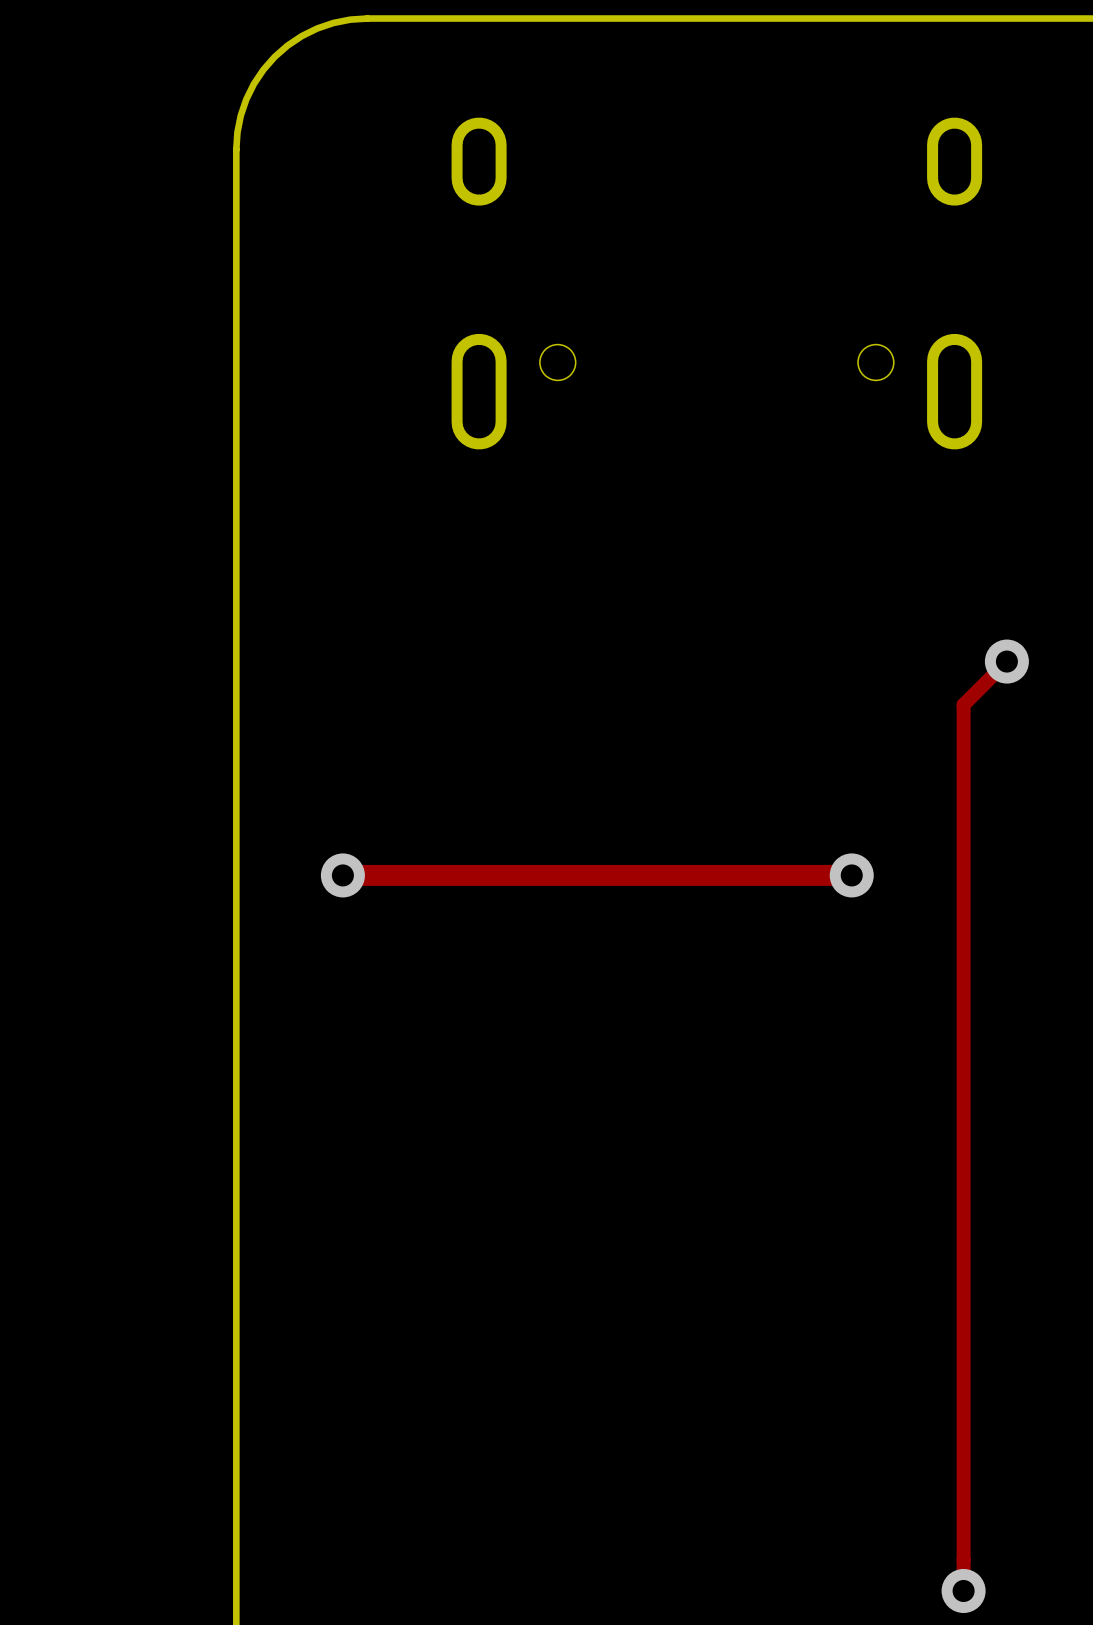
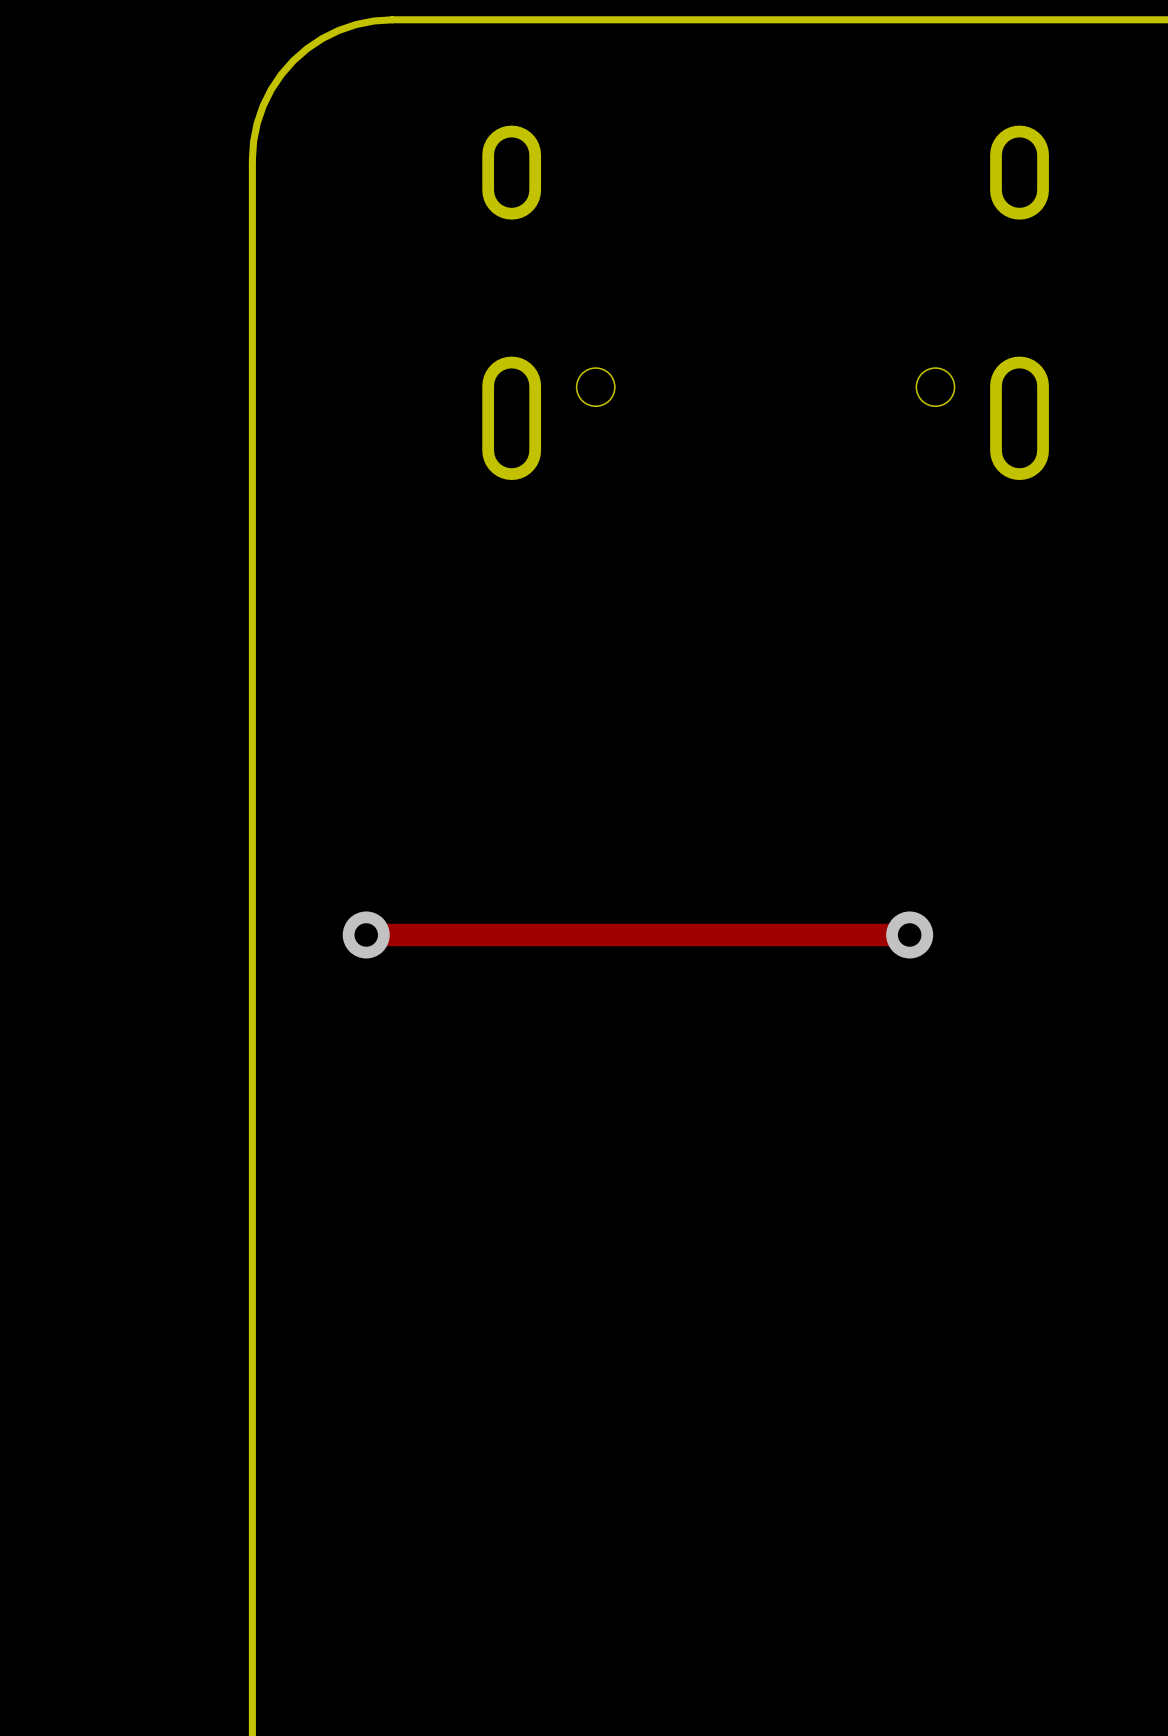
track: (1006, 661) (963, 704) (963, 1590) -> none
via: (1006, 661) -> none
via: (963, 1590) -> none

